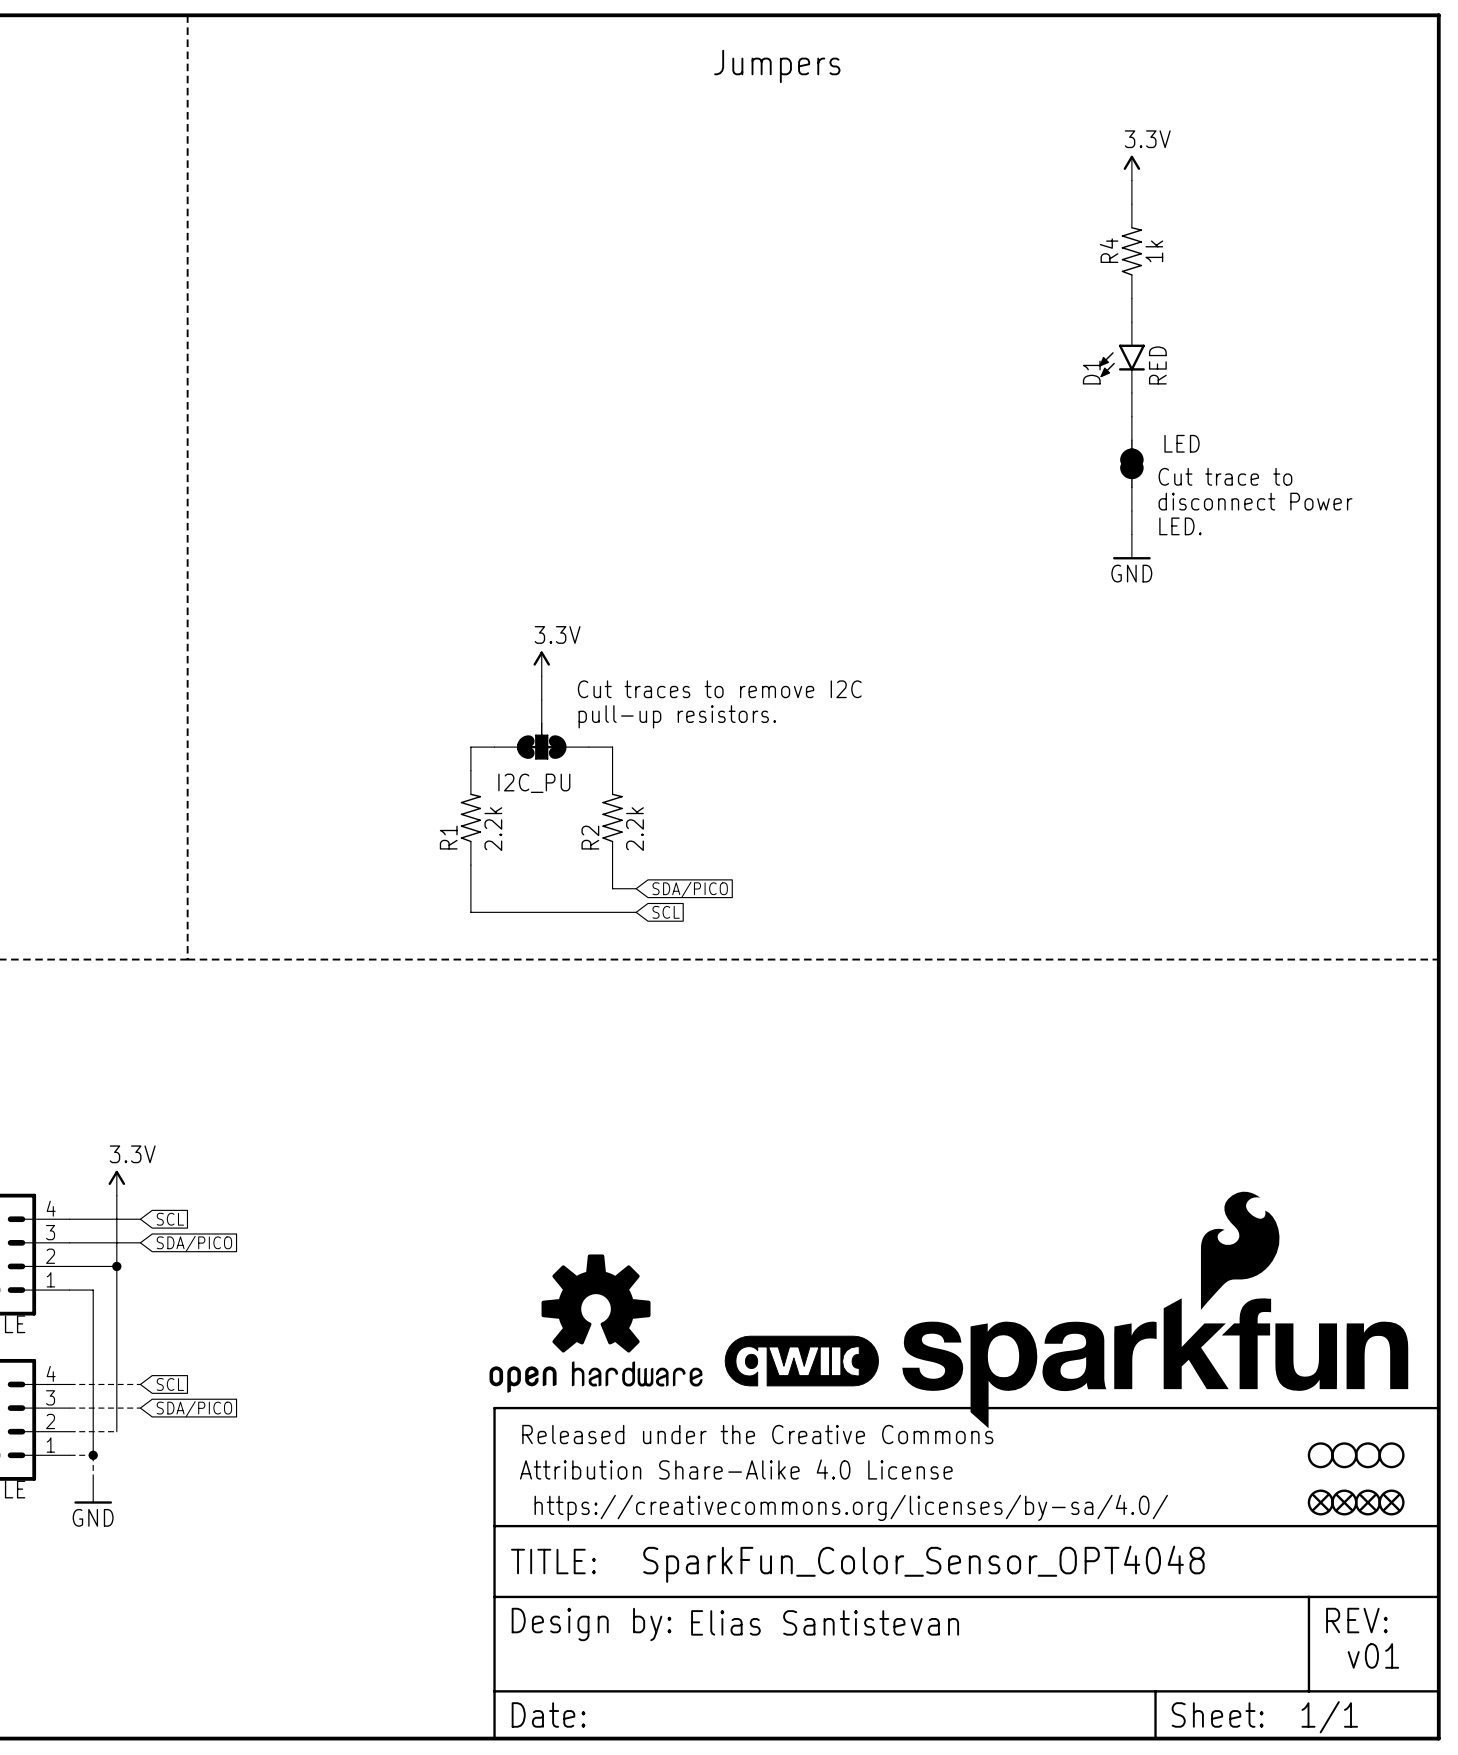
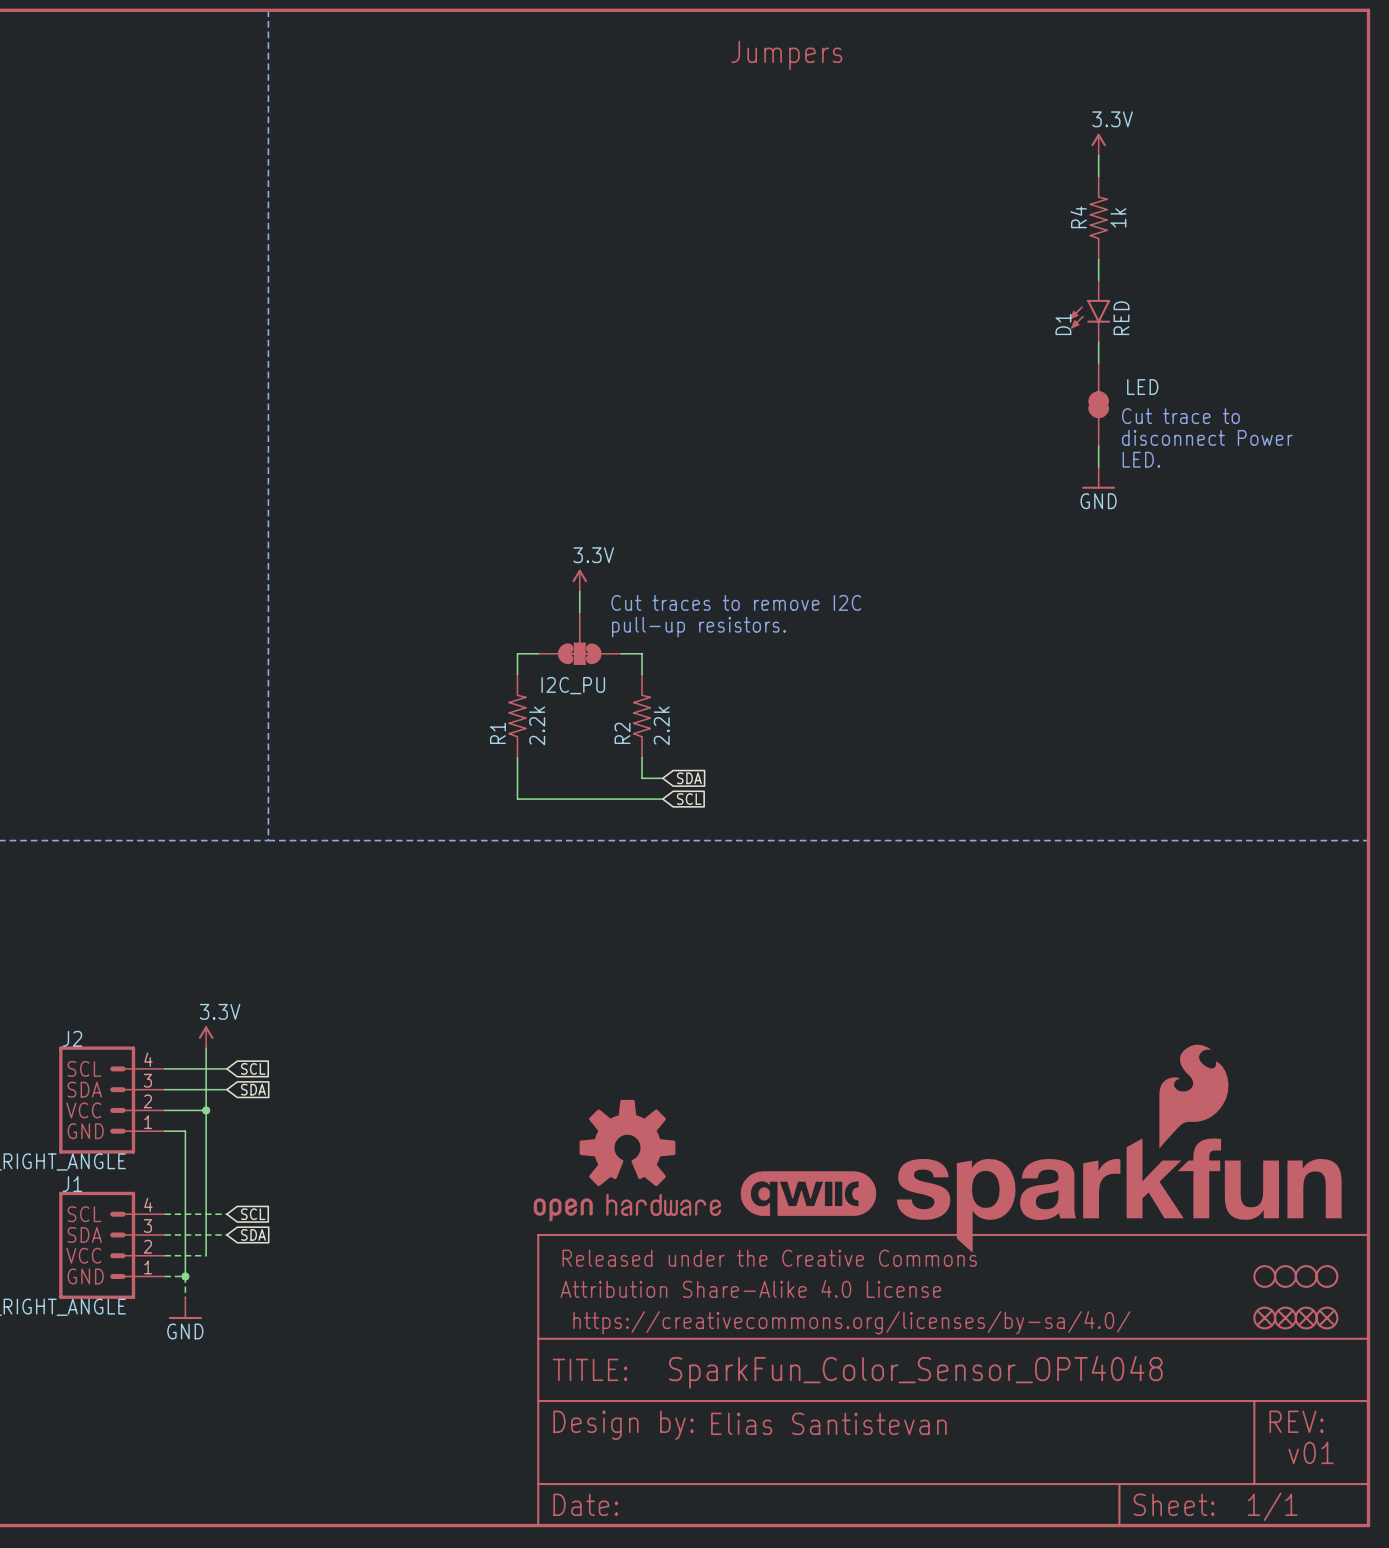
global label: SDA/PICO (690, 889) -> SDA (689, 778)
global label: SDA/PICO (194, 1243) -> SDA (253, 1089)
global label: SDA/PICO (194, 1409) -> SDA (253, 1234)

